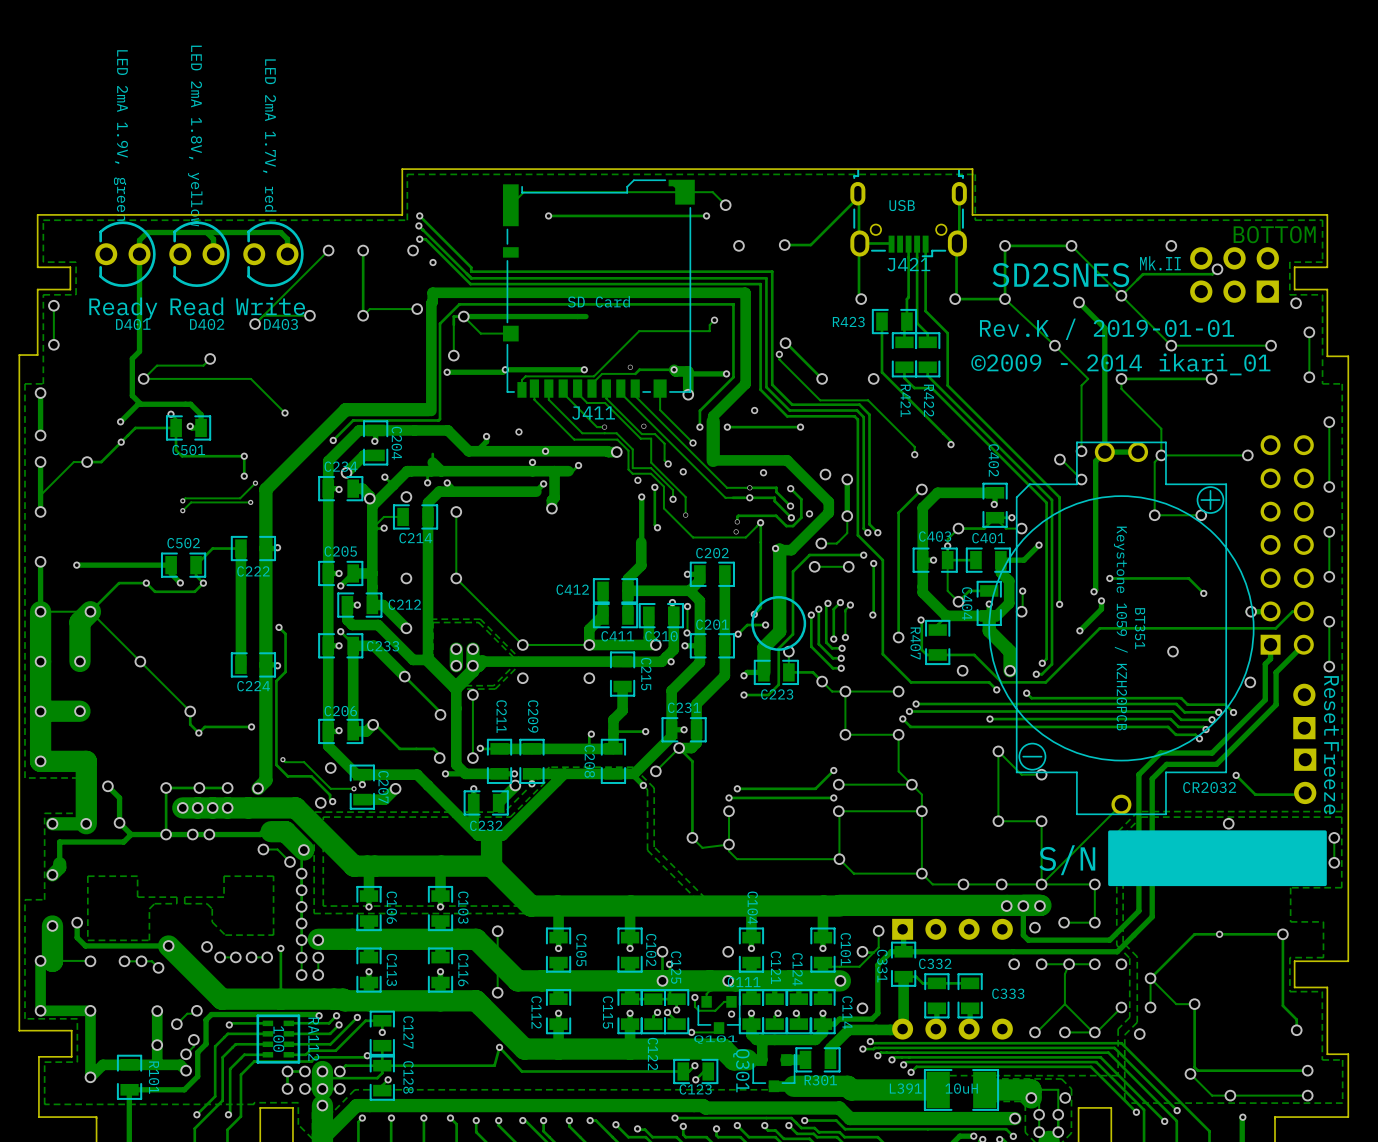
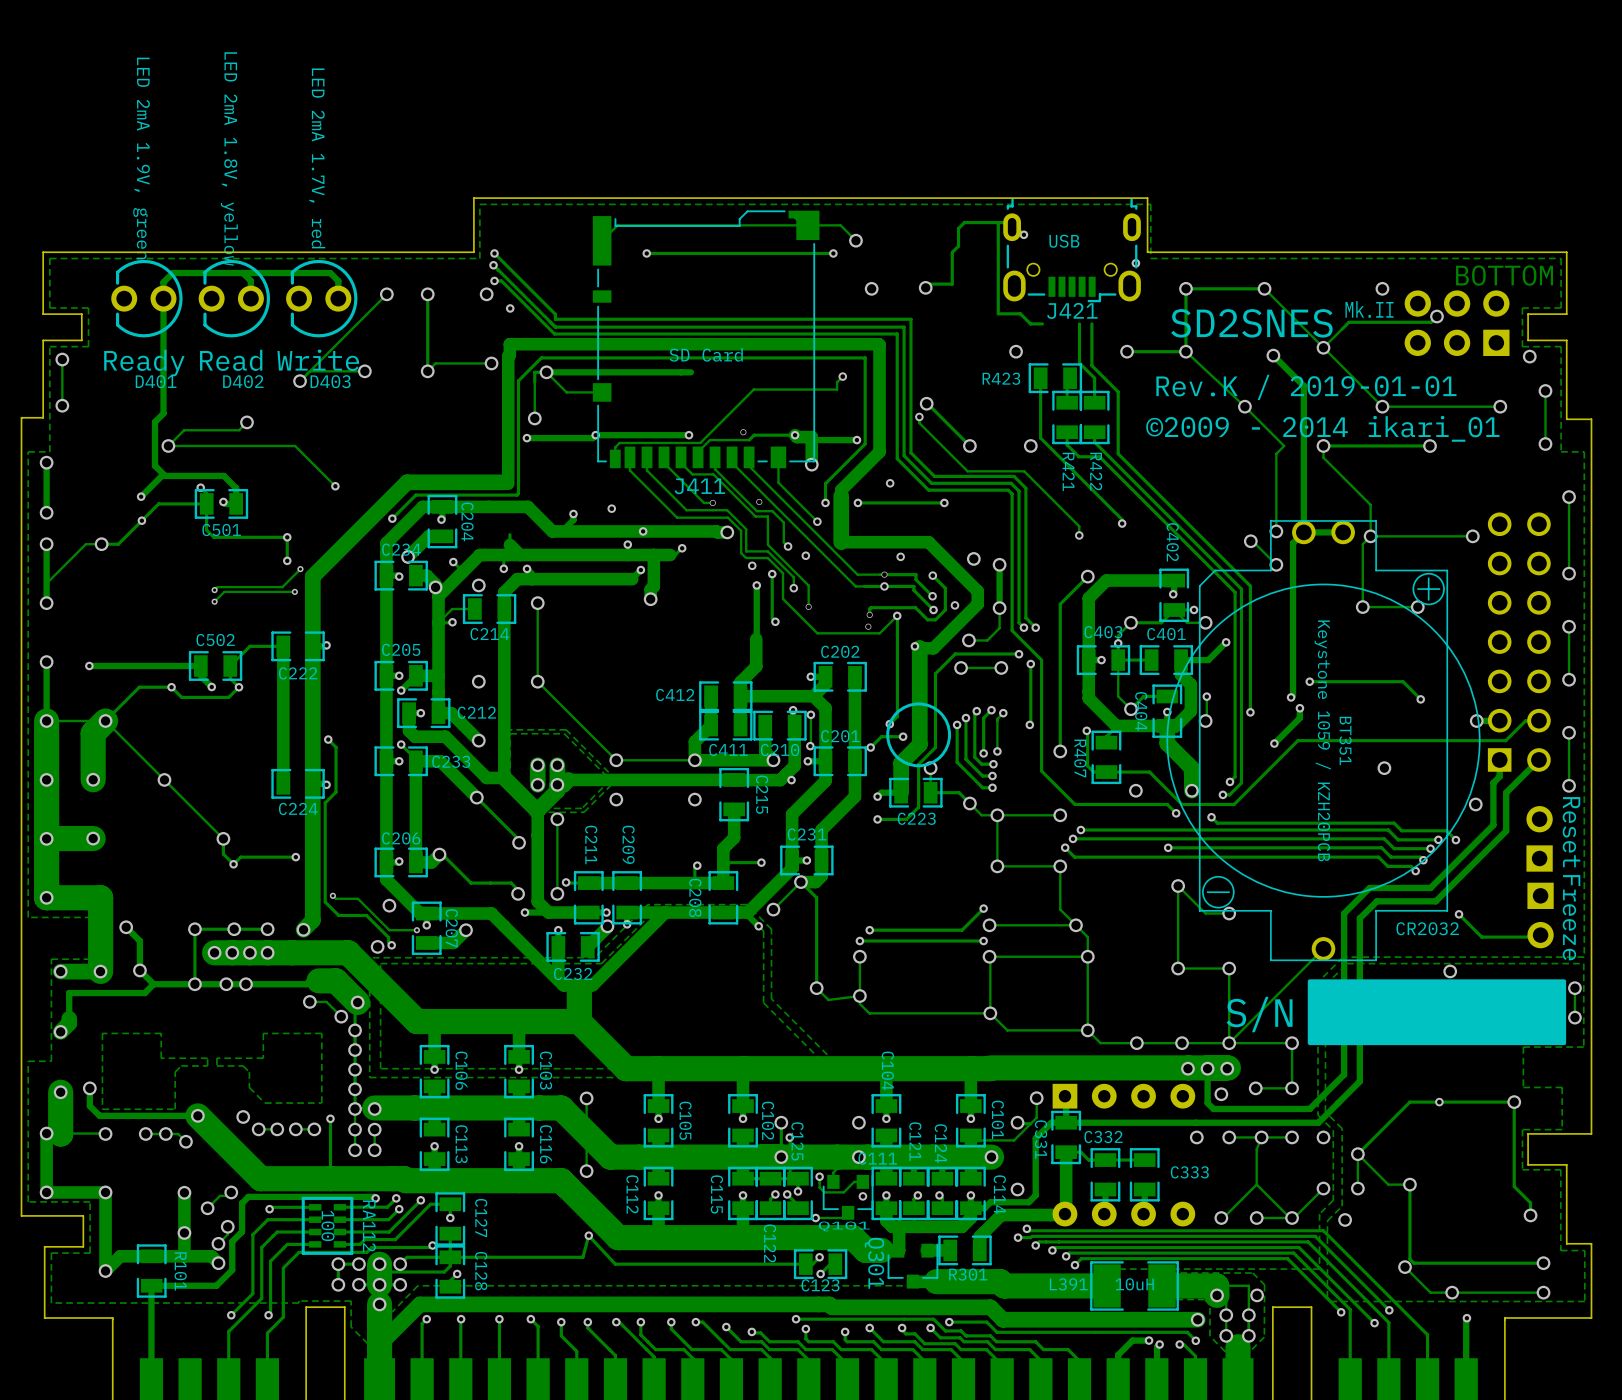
track: (857, 183) (859, 185) (859, 296) (861, 299) -> none
track: none -> (998, 222) (998, 313) (1020, 313) (1030, 323) (1042, 323)
track: (857, 193) (857, 198) (810, 245) (784, 245) -> none
track: (959, 193) (955, 299) -> none
track: none -> (1023, 234) (1011, 222) (964, 222) (958, 228) (958, 246) (952, 252) (952, 284) (929, 284)
via: none -> (1023, 234)
via: none -> (1135, 263)
track: (859, 243) (891, 244) -> none
track: (908, 244) (906, 321) -> none
track: (917, 244) (917, 323) (927, 333) -> (1079, 323) (1079, 363) (1094, 378) (1094, 392)
track: (925, 244) (925, 311) -> (1091, 323) (1092, 365)

